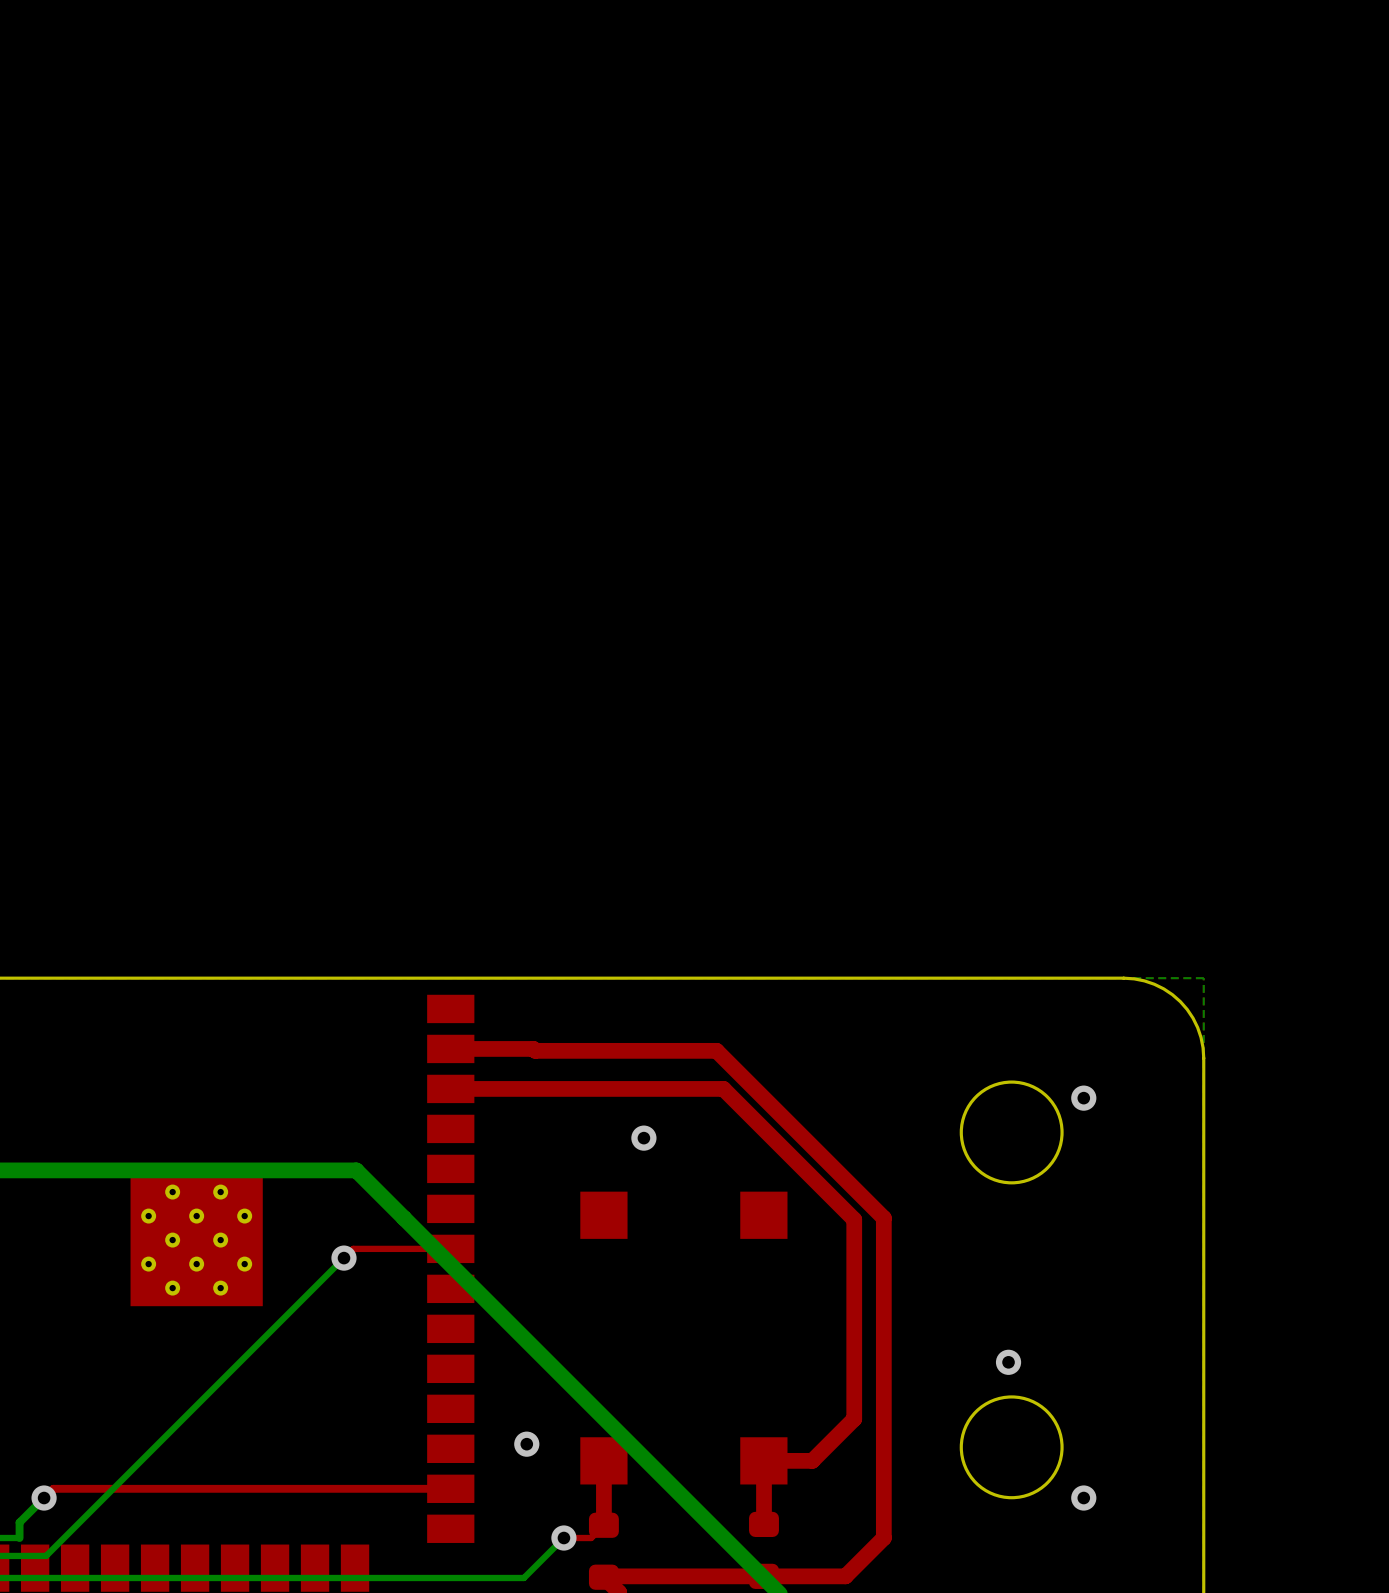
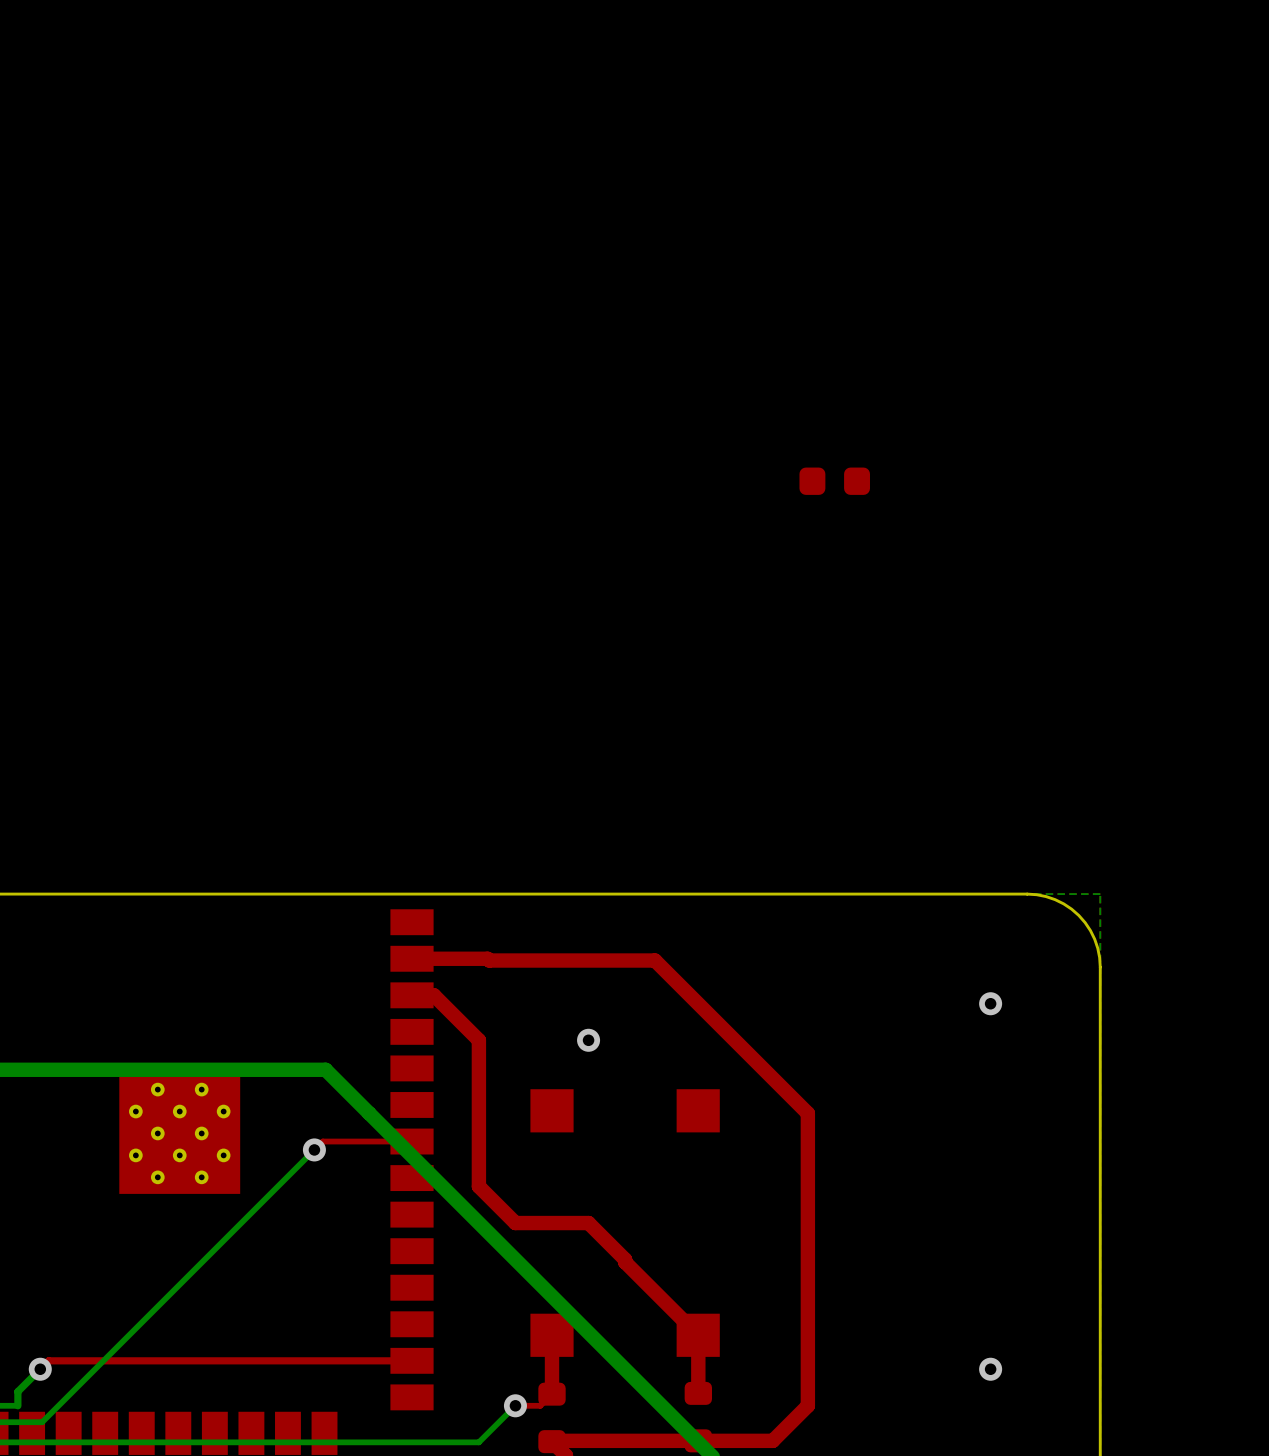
part: none -> (834, 481)
round board edge: [959, 1080, 1064, 1185] -> none
top track: (474, 1088) (723, 1088) (854, 1219) (854, 1418) (812, 1460) (763, 1460) -> (433, 995) (478, 1040) (478, 1186) (515, 1223) (588, 1223) (698, 1335)
via: (1008, 1362) -> none
round board edge: [959, 1395, 1064, 1500] -> none
via: (526, 1444) -> none

